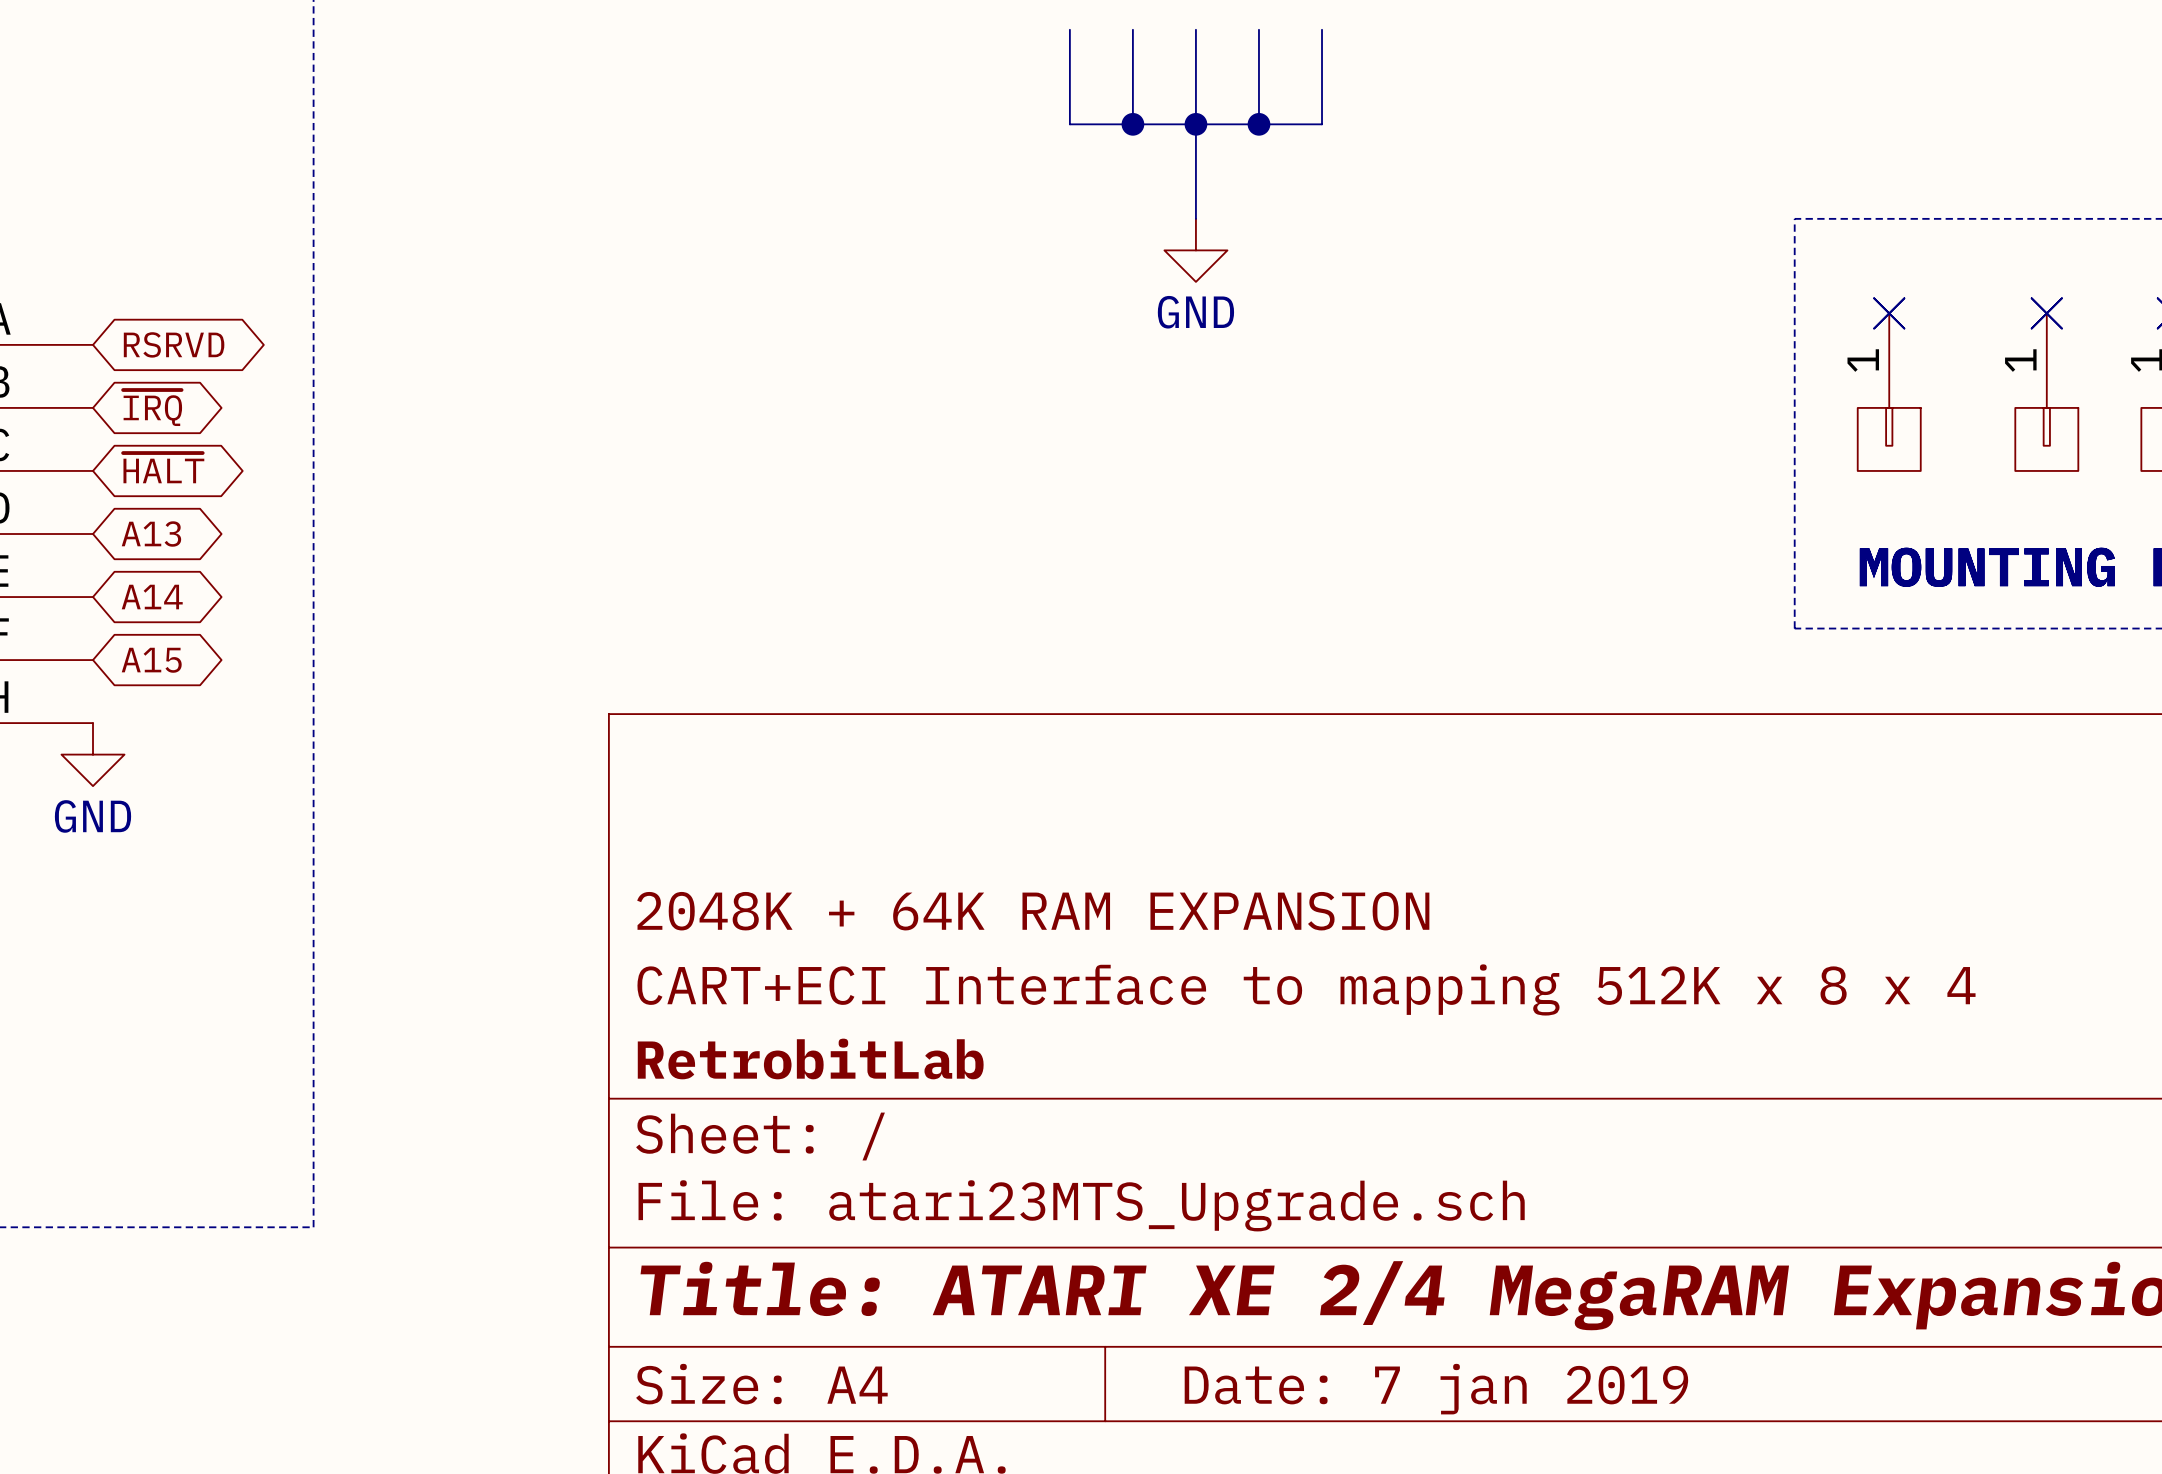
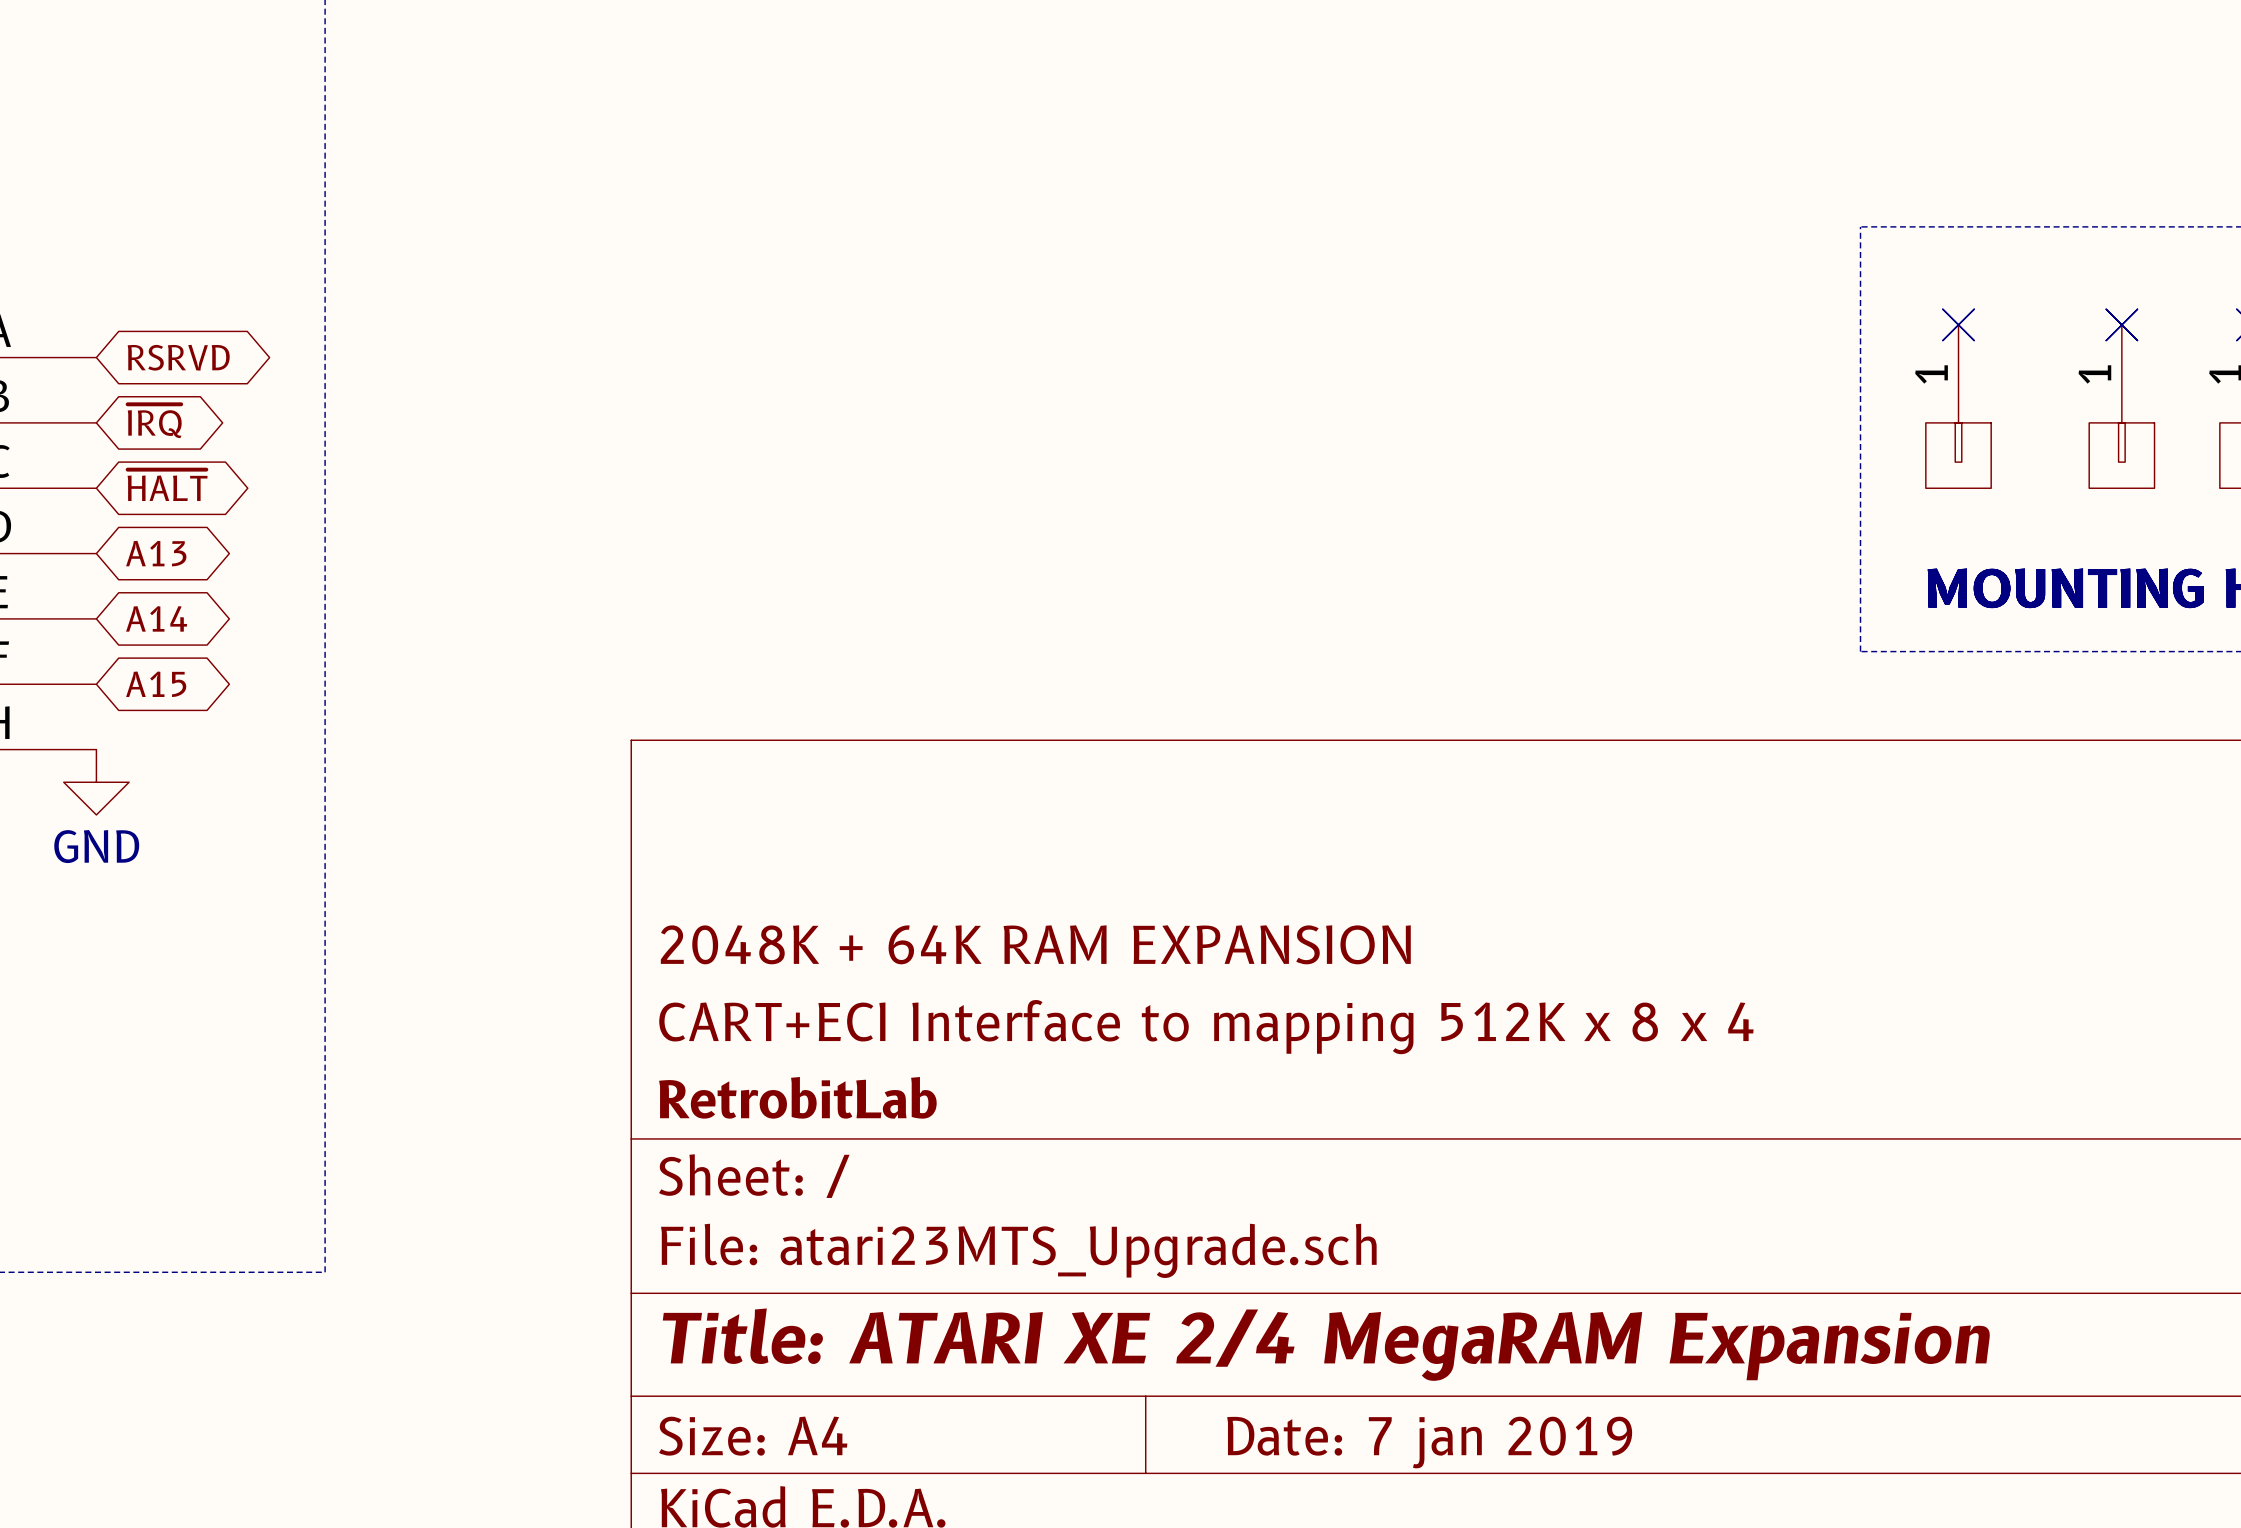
wire: (1069, 29) (1069, 124) (1322, 124) (1322, 29) -> none
wire: (1132, 29) (1132, 124) -> none
wire: (1195, 29) (1195, 218) -> none
wire: (1258, 29) (1258, 124) -> none
junction: (1132, 124) -> none
junction: (1195, 124) -> none
junction: (1258, 124) -> none
power symbol: GND (1195, 250) -> none

